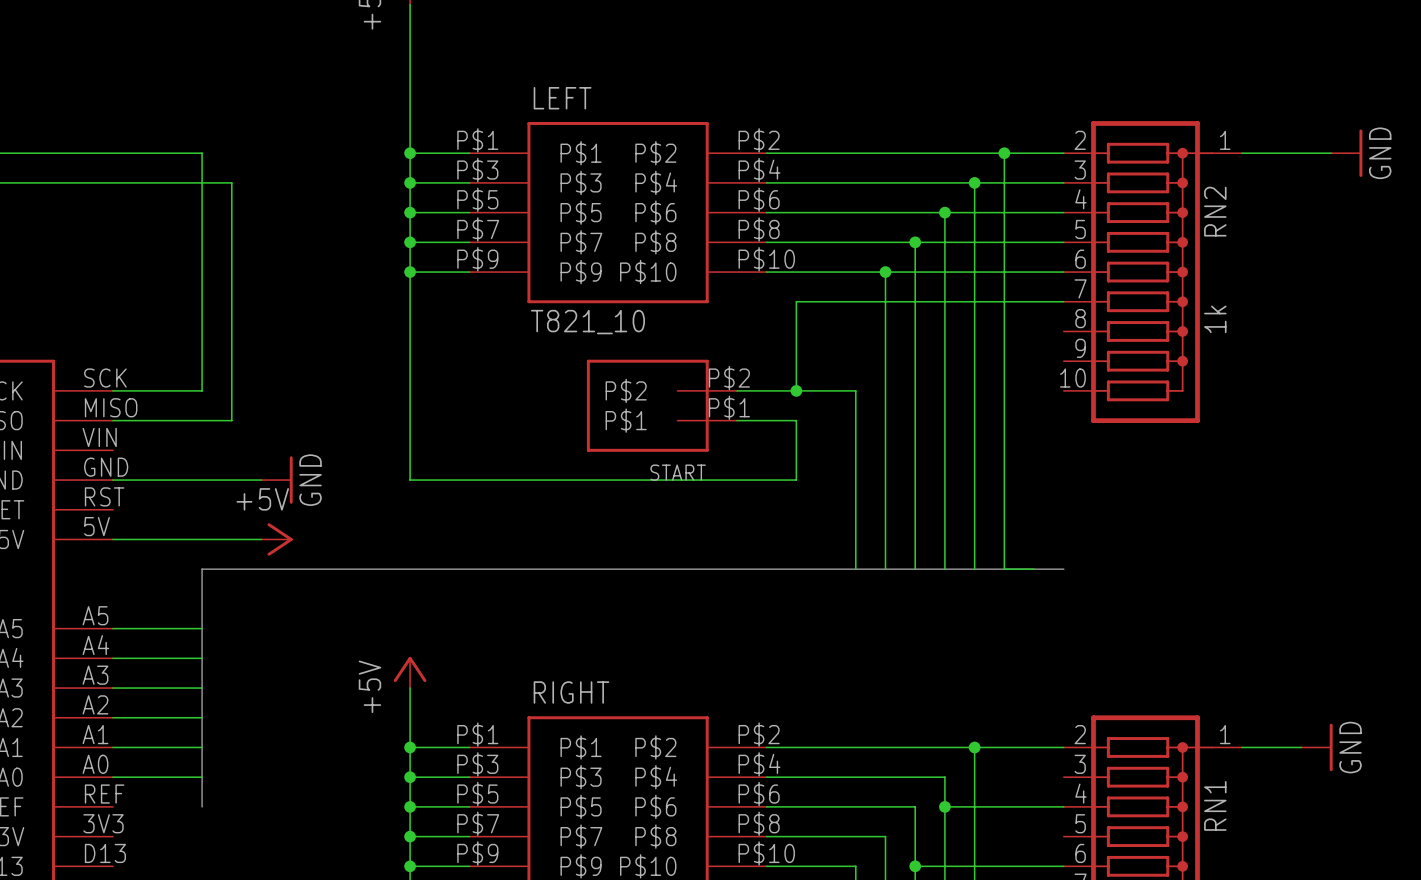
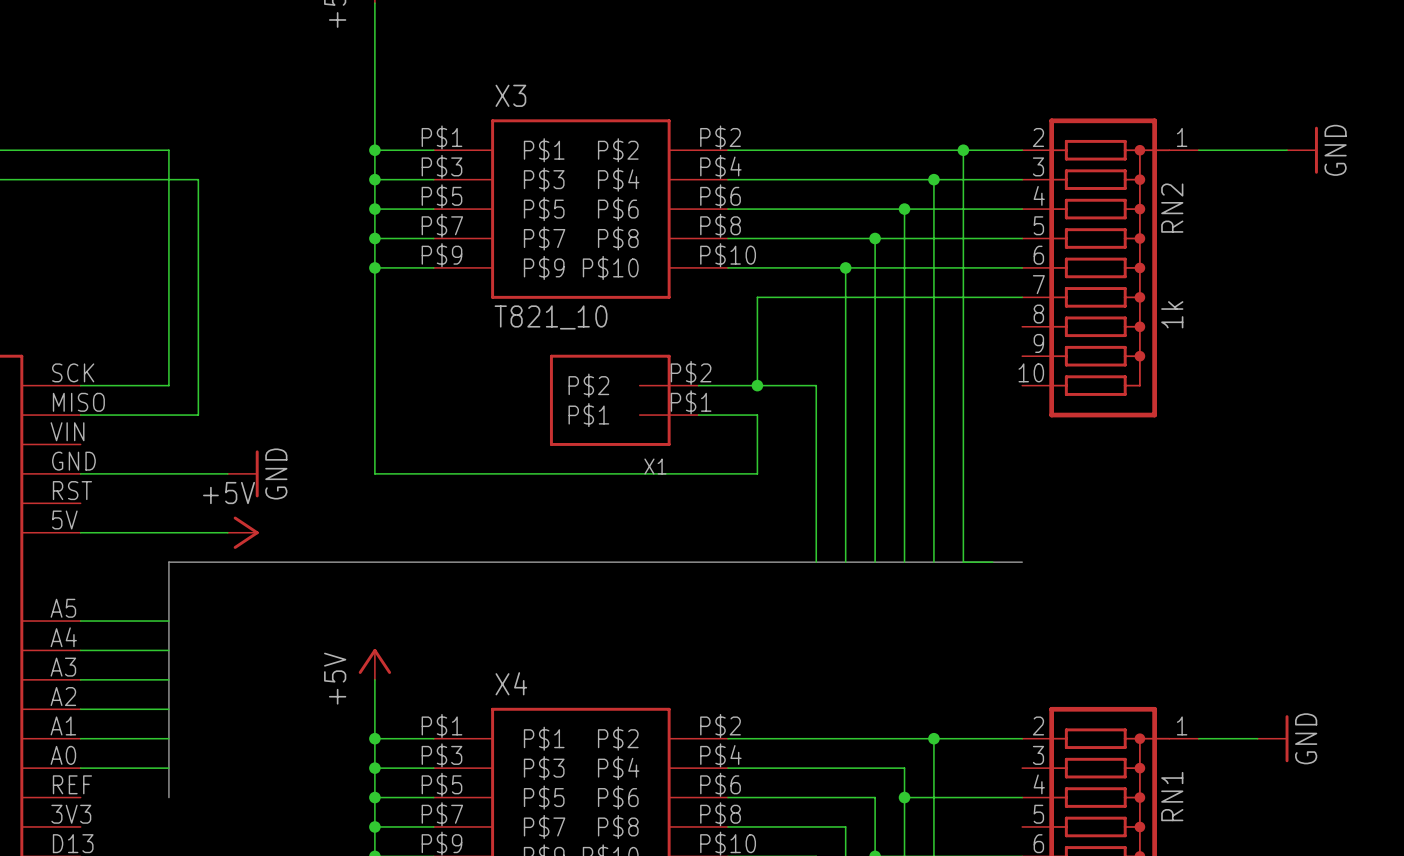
LEFT name: LEFT (562, 98) -> X3 (510, 95)
START name: START (678, 472) -> X1 (655, 466)
RIGHT name: RIGHT (571, 692) -> X4 (511, 683)

